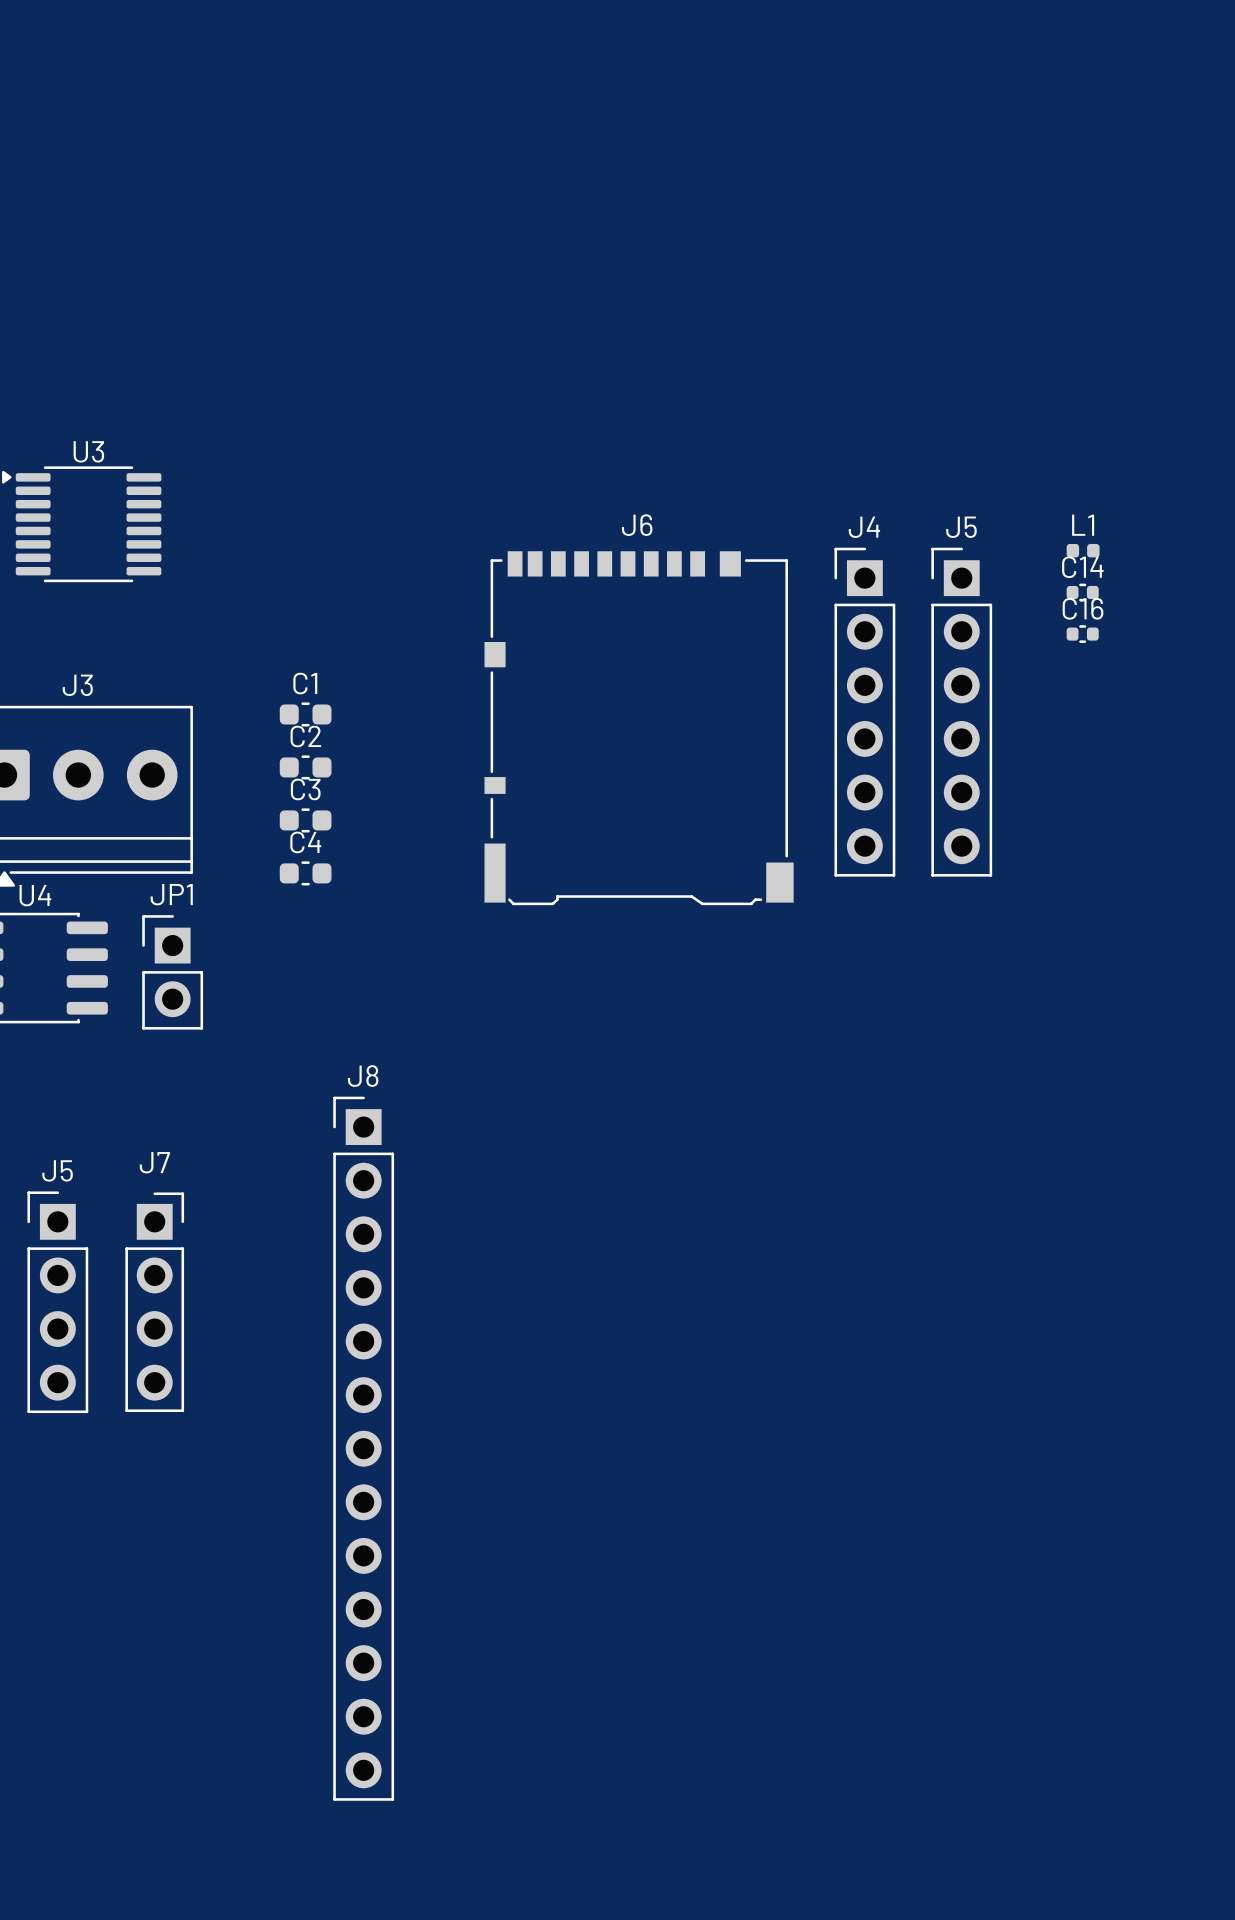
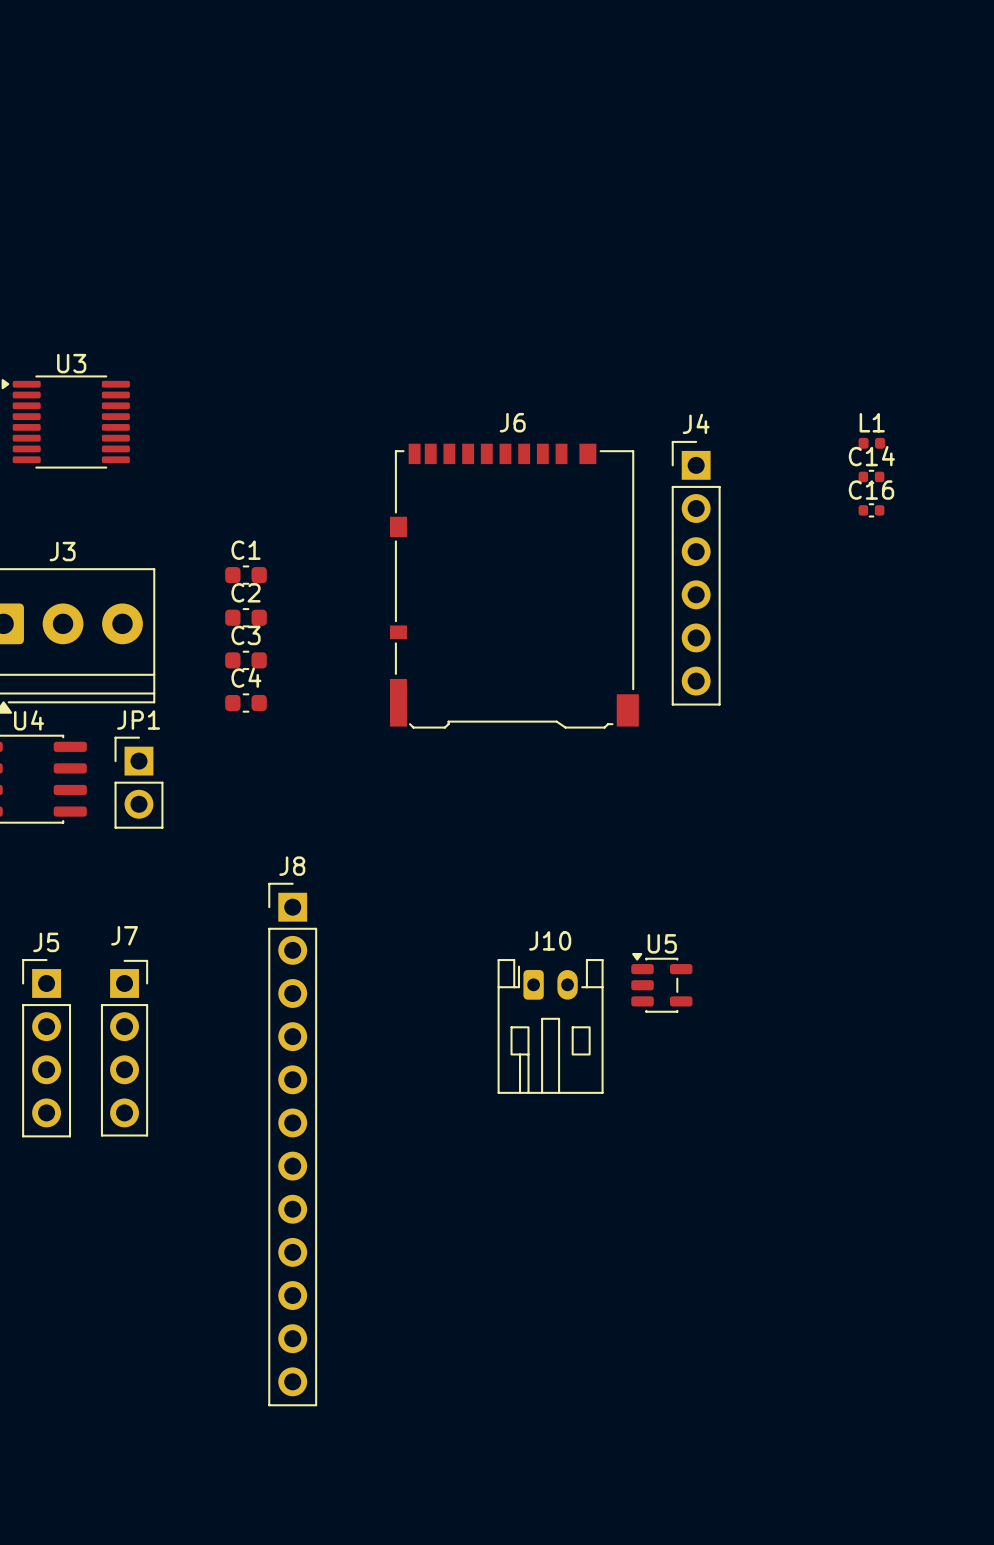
J5: (961, 712) -> none
J8 footprint: [333, 1096, 395, 1801] -> [268, 882, 318, 1407]
U5: none -> (661, 982)
J10: none -> (550, 1026)

